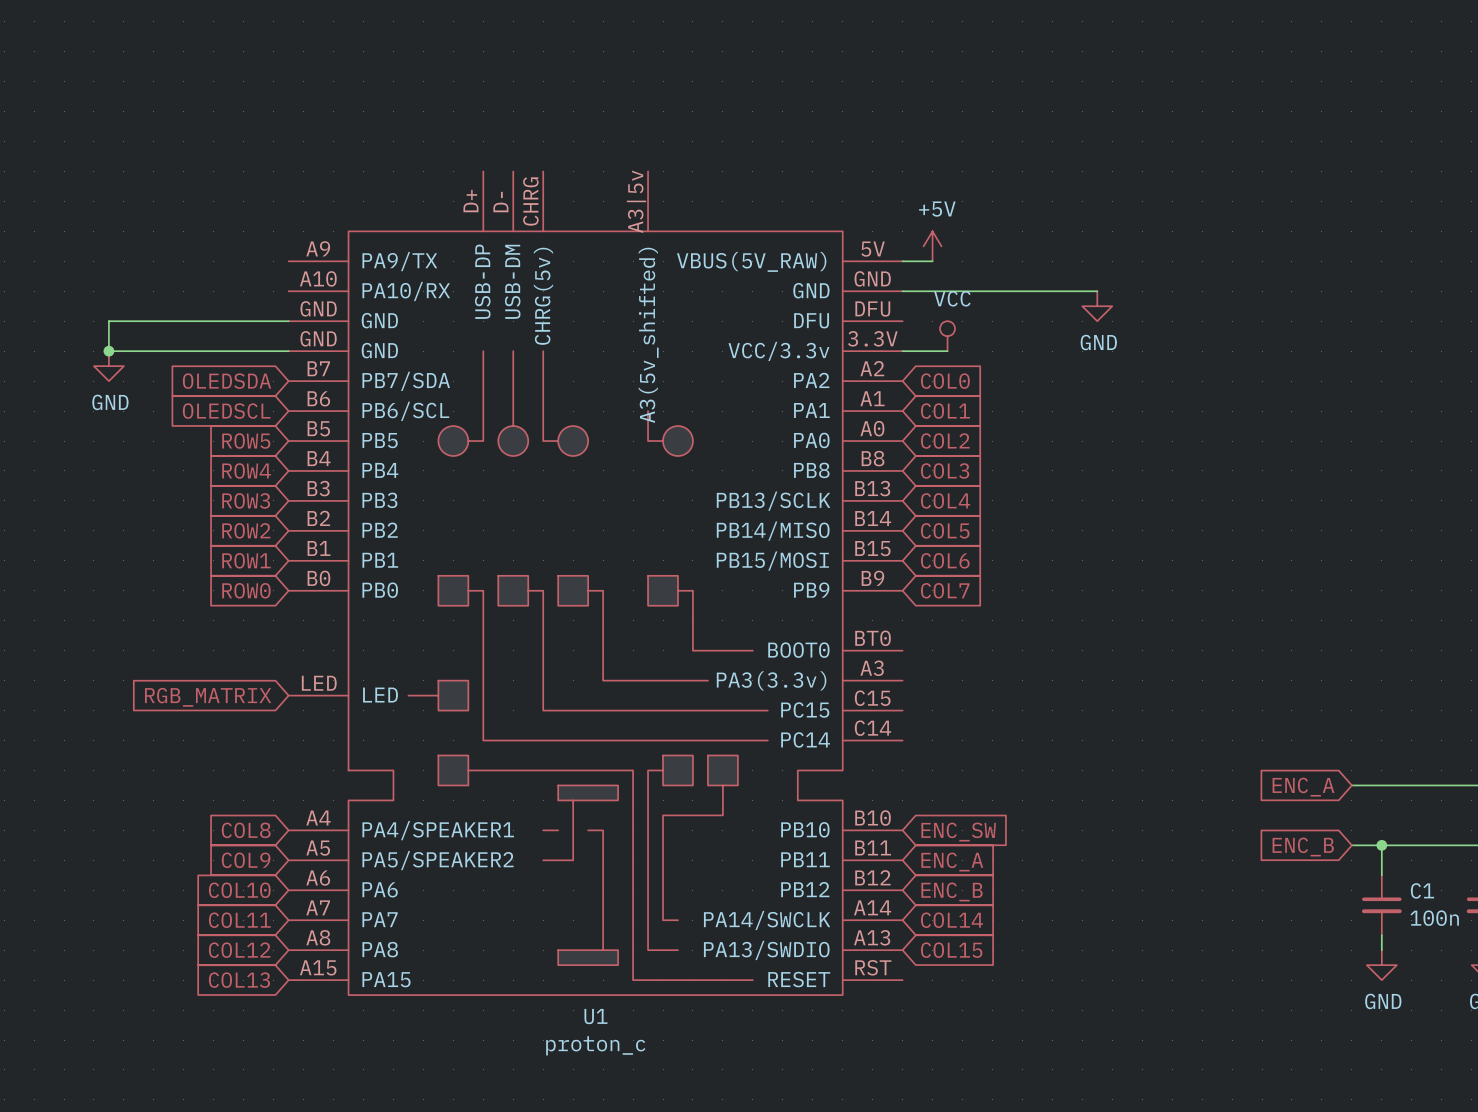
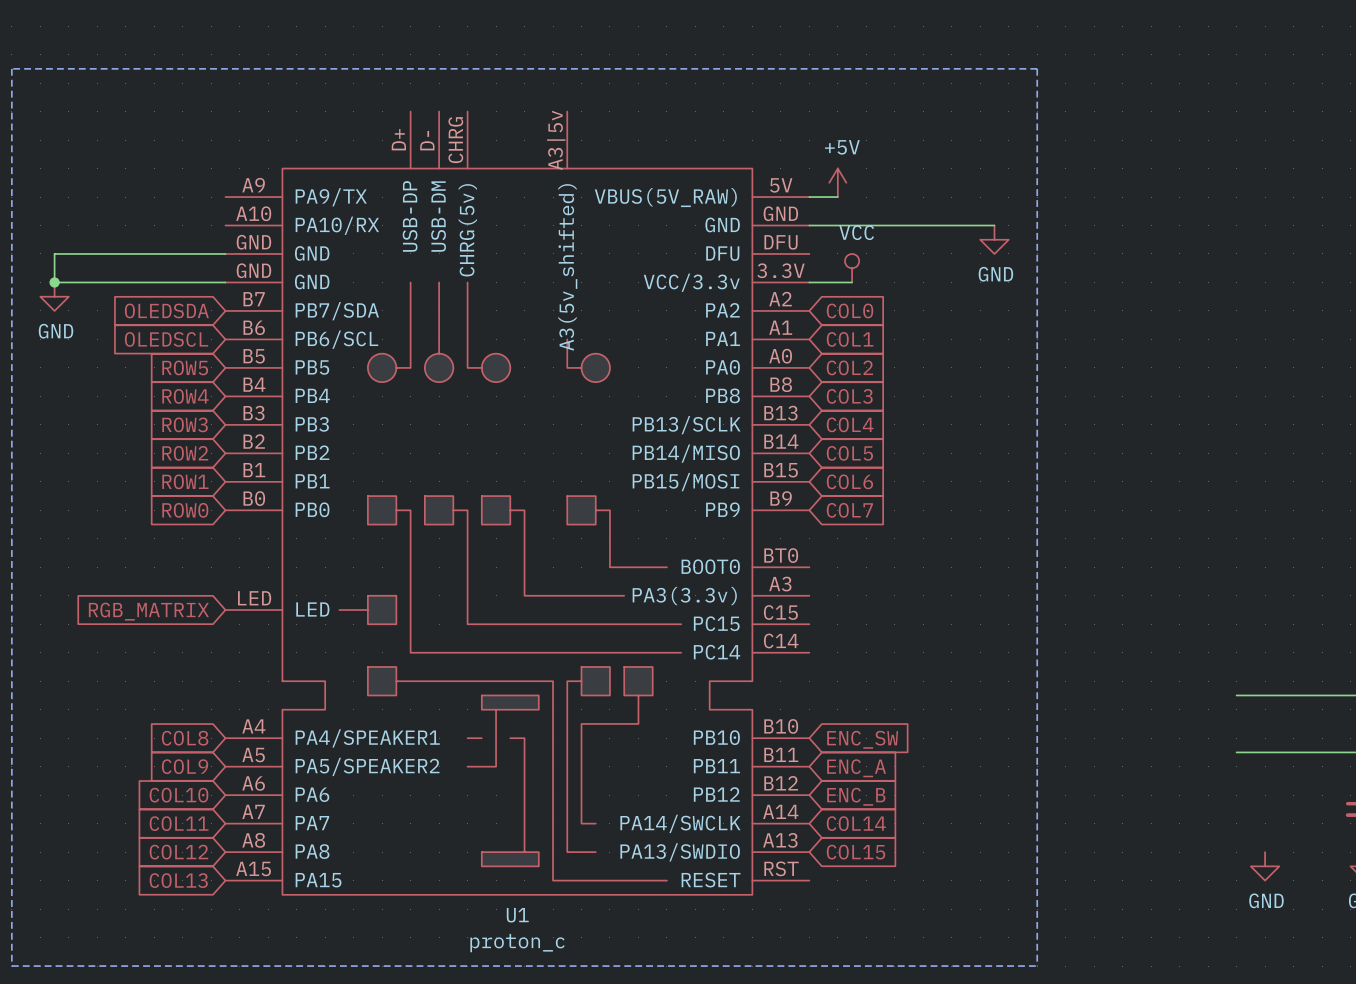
line: none -> (11, 68) (1037, 68) (1037, 966) (11, 966) (11, 68)
global label: ENC_A (1303, 787) -> none
wire: (1381, 845) (1381, 875) -> none
junction: (1381, 845) -> none
global label: ENC_B (1303, 847) -> none
C1: 100n (1381, 905) -> none
wire: (1381, 935) (1381, 950) -> none

